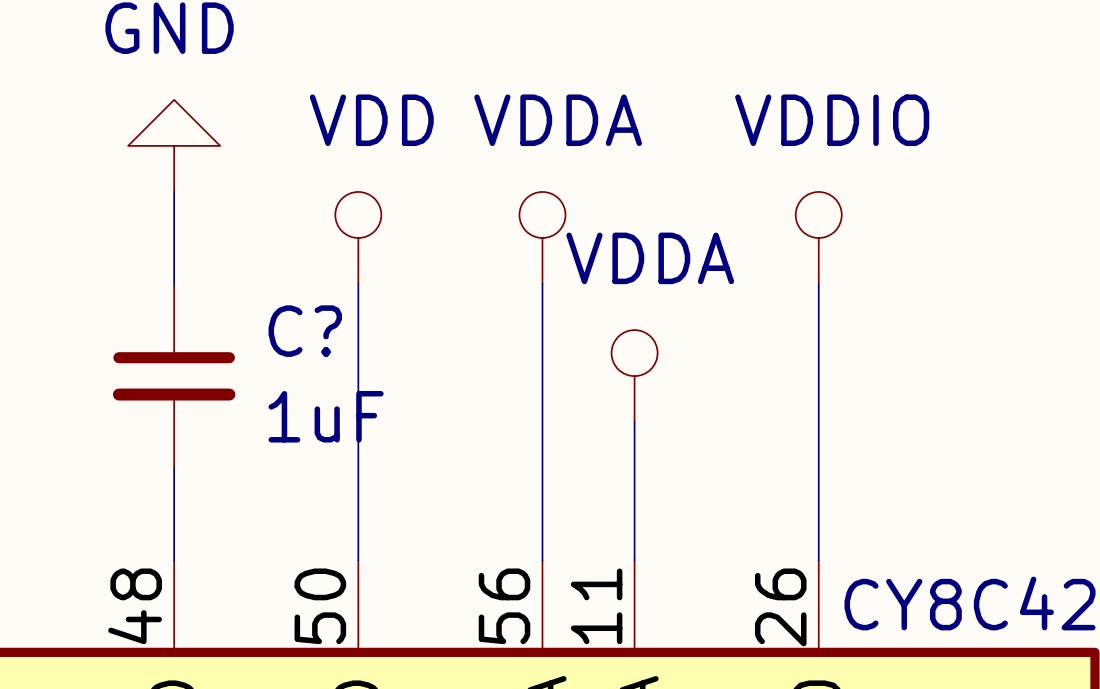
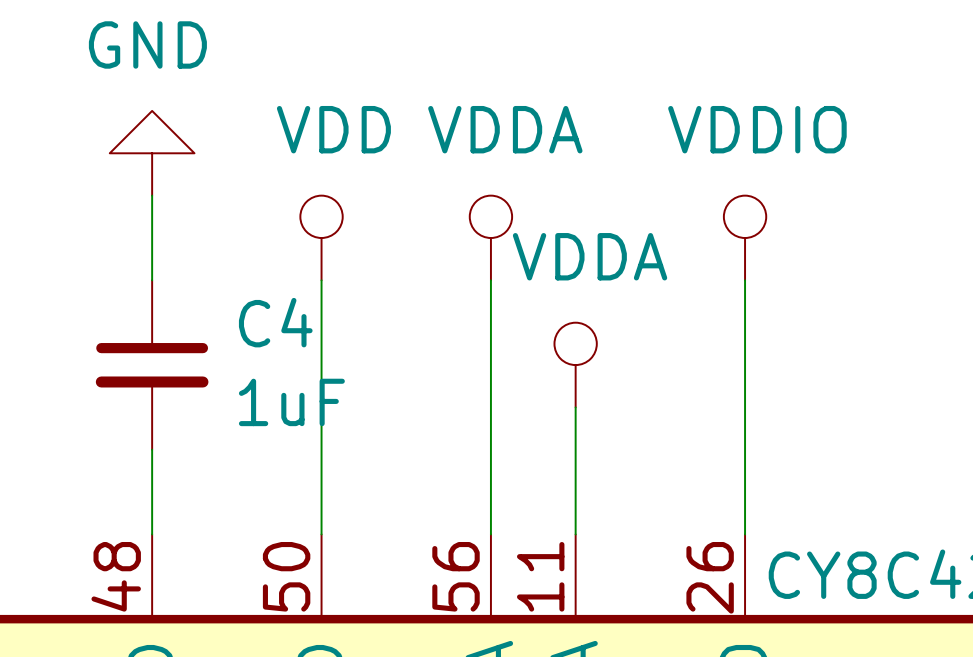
C? name: C? (305, 331) -> C4 (275, 322)

